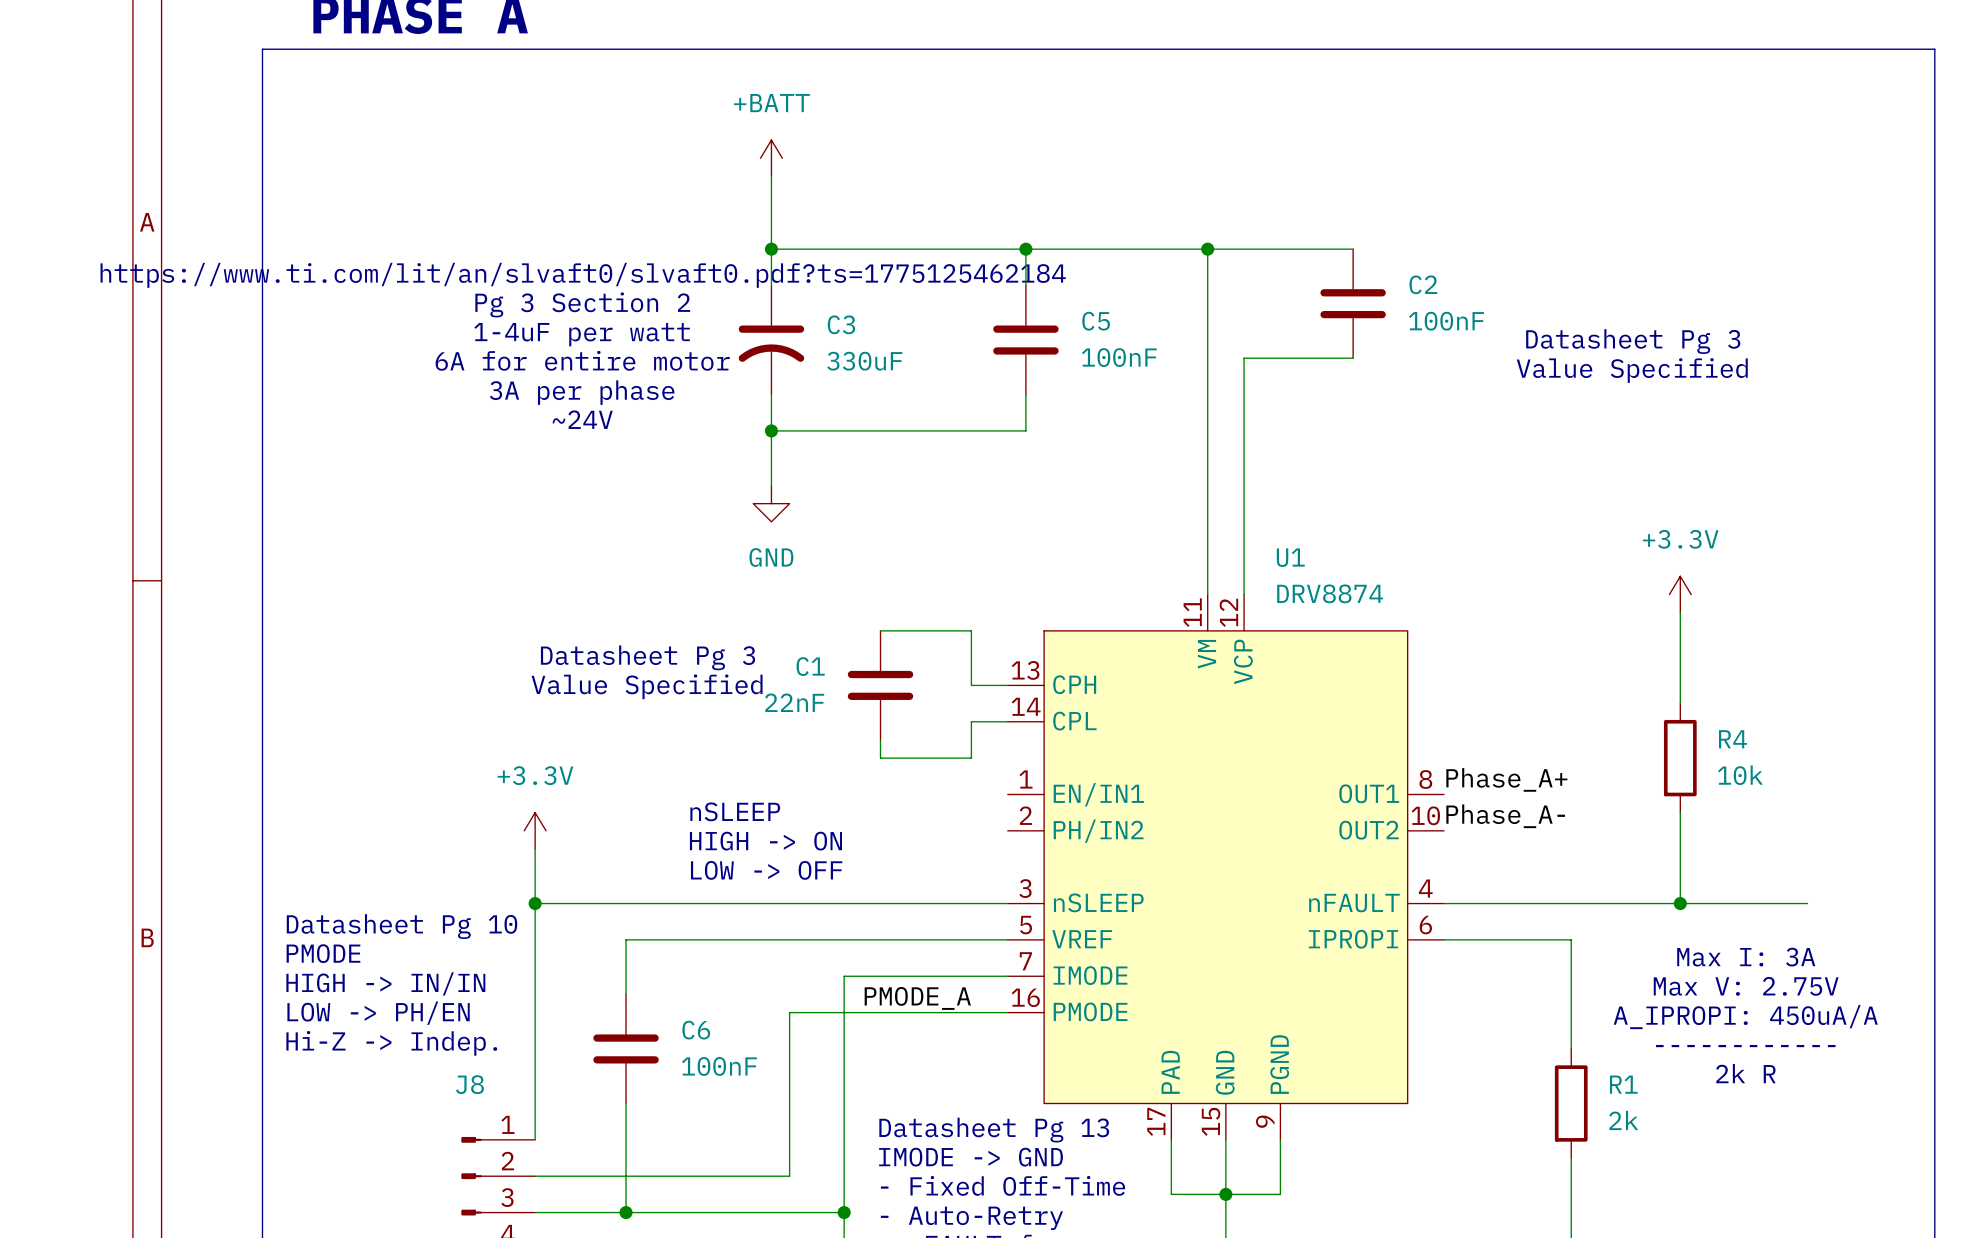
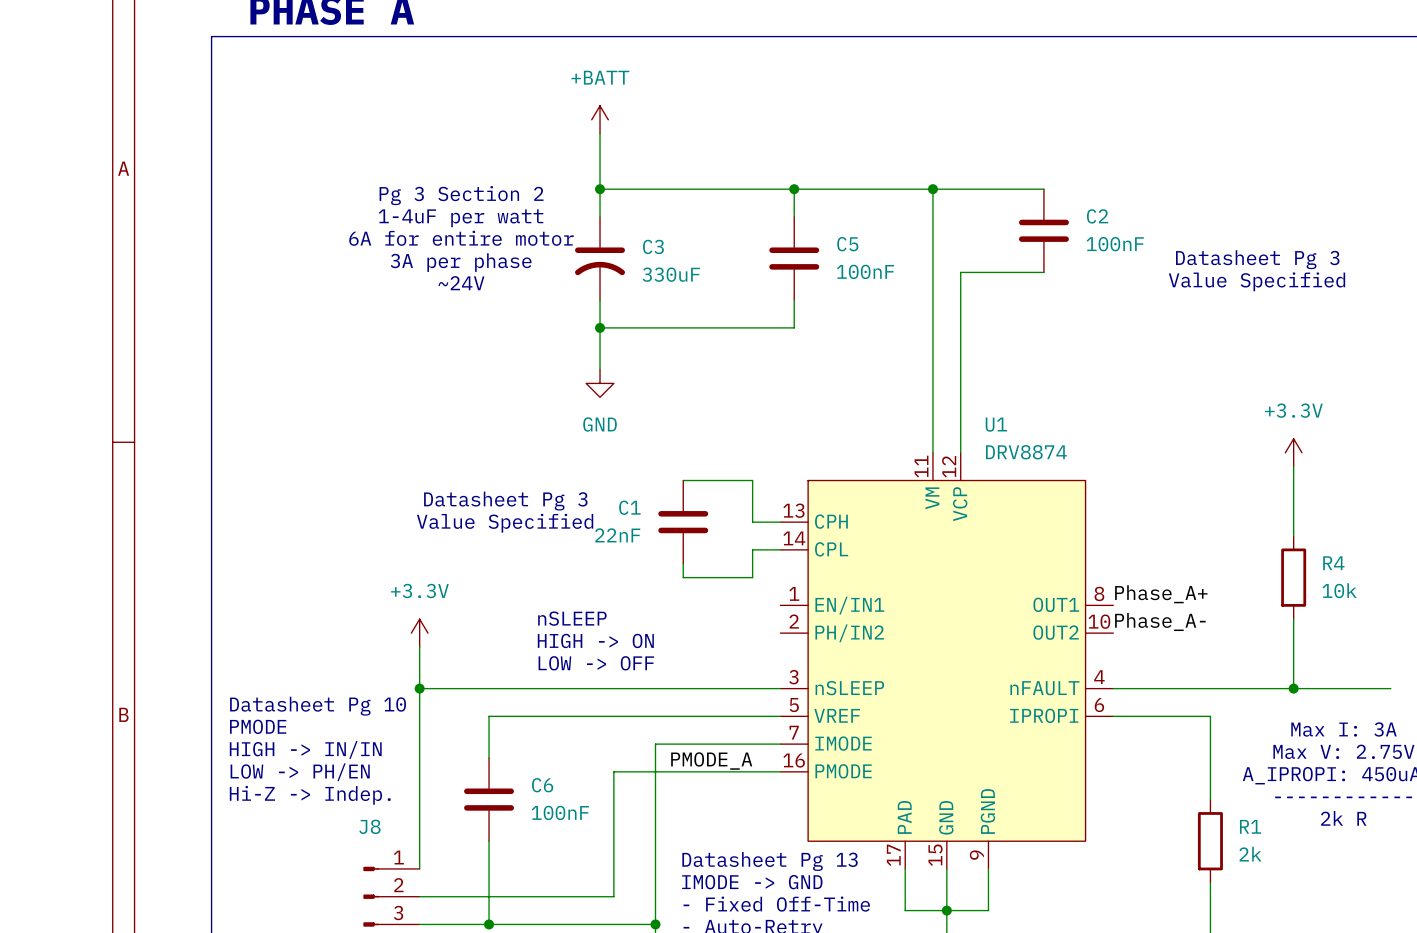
text: https://www.ti.com/lit/an/slvaft0/slvaft0.pdf?ts=1775125462184 (583, 275) -> none
text position: Pg 3 Section 2 (582, 304) -> Pg 3 Section 2 (461, 195)
text position: 1-4uF per watt (582, 334) -> 1-4uF per watt (461, 218)
text position: 6A for entire motor (582, 360) -> 6A for entire motor (461, 238)
text position: 3A per phase (582, 392) -> 3A per phase (461, 262)
text position: ~24V (582, 419) -> ~24V (461, 283)

